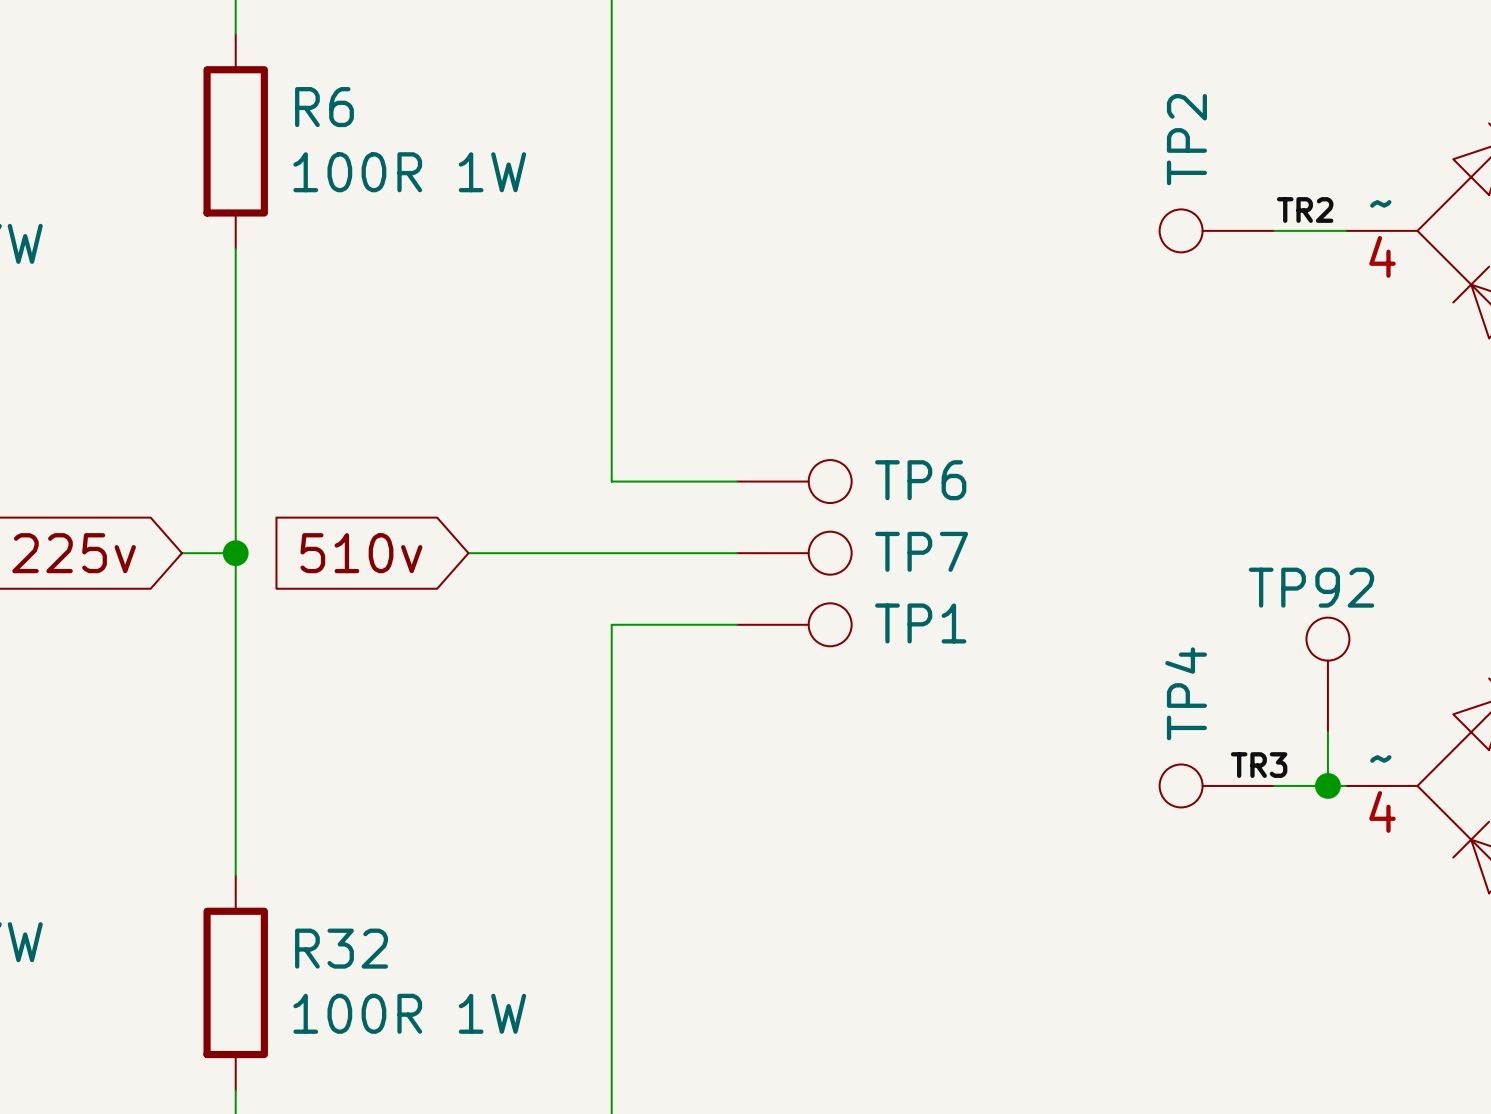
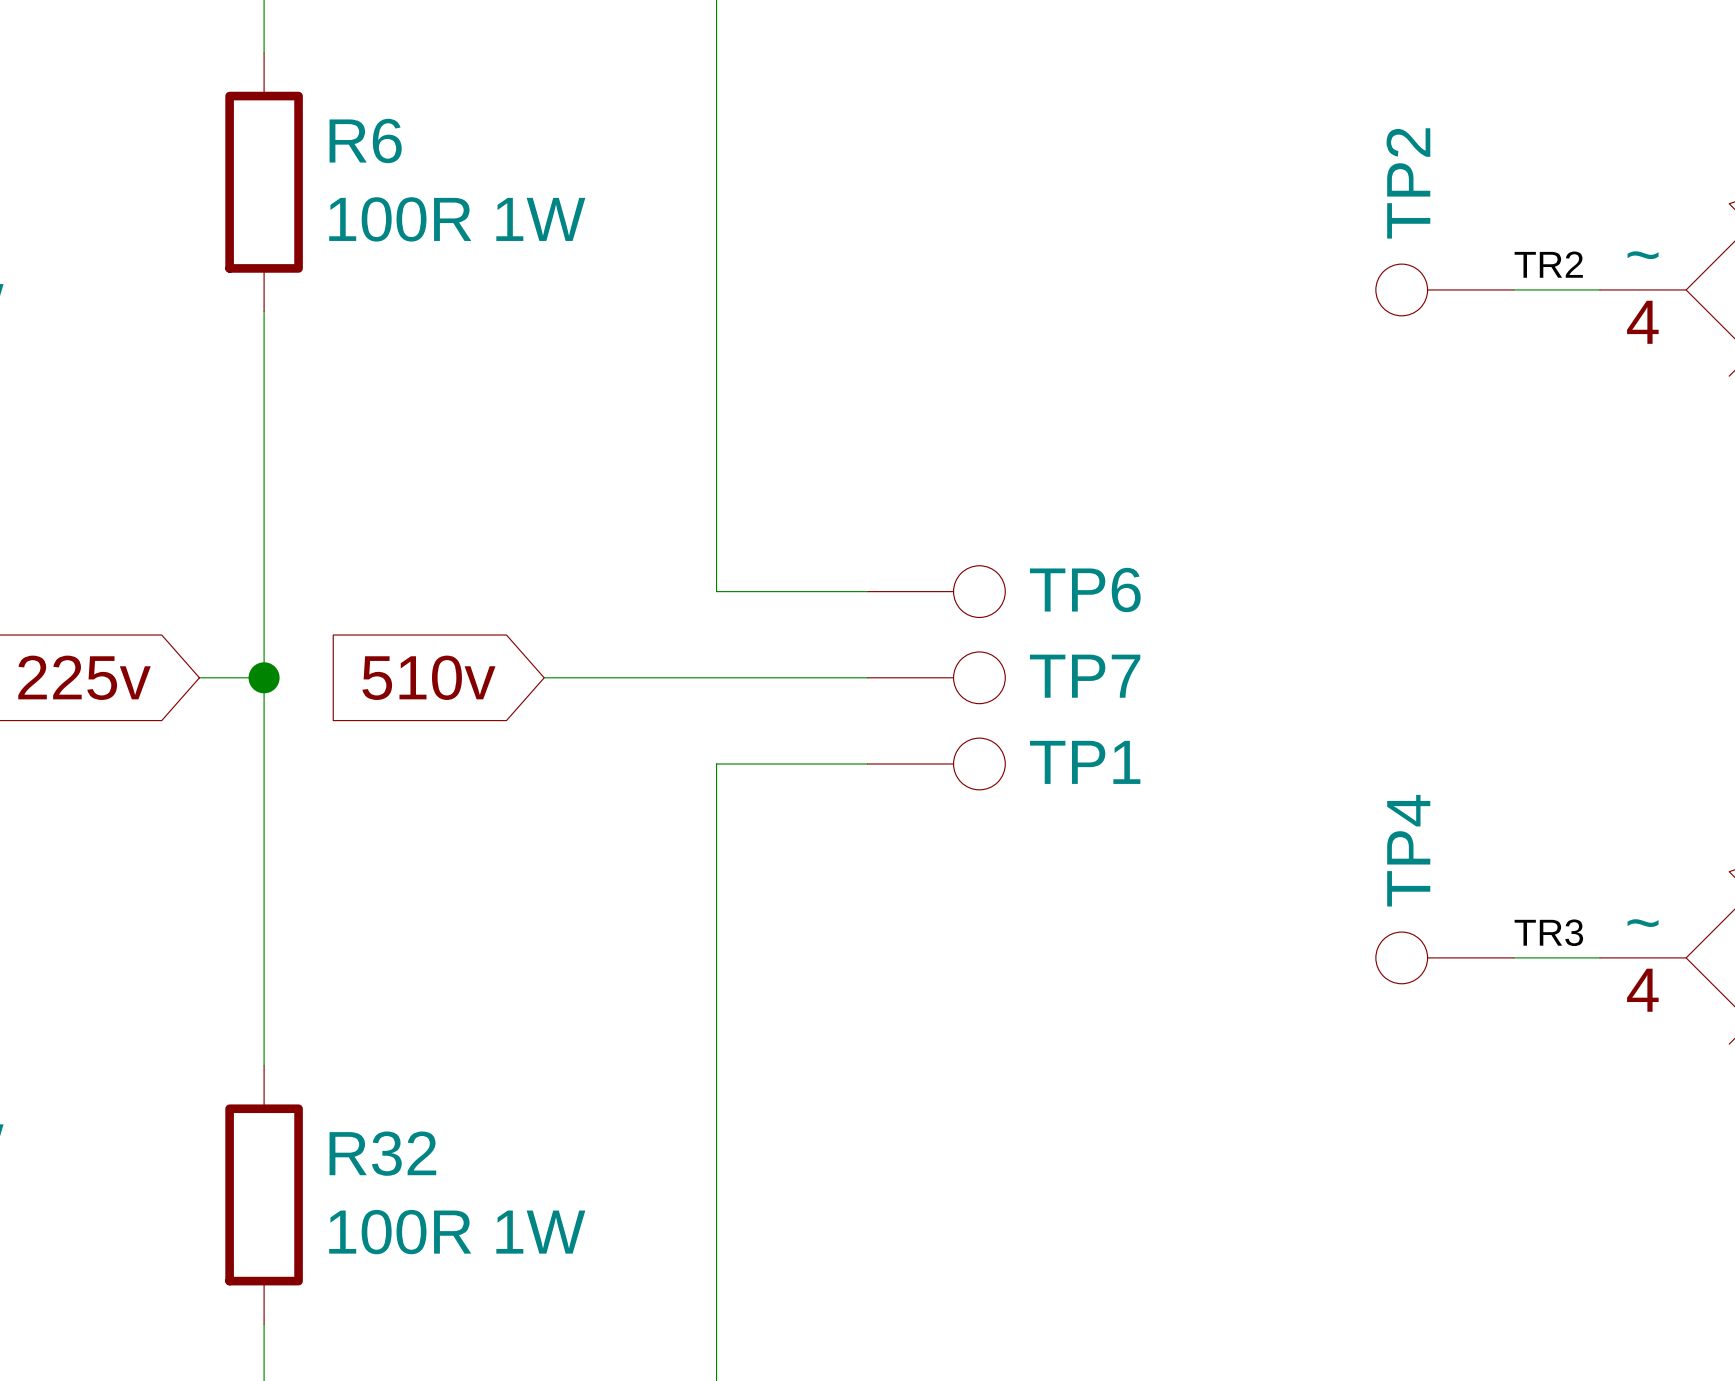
TP92: (1327, 674) -> none
wire: (1327, 732) (1327, 785) -> none
label position: TR3 (1259, 765) -> TR3 (1548, 932)
junction: (1327, 785) -> none

